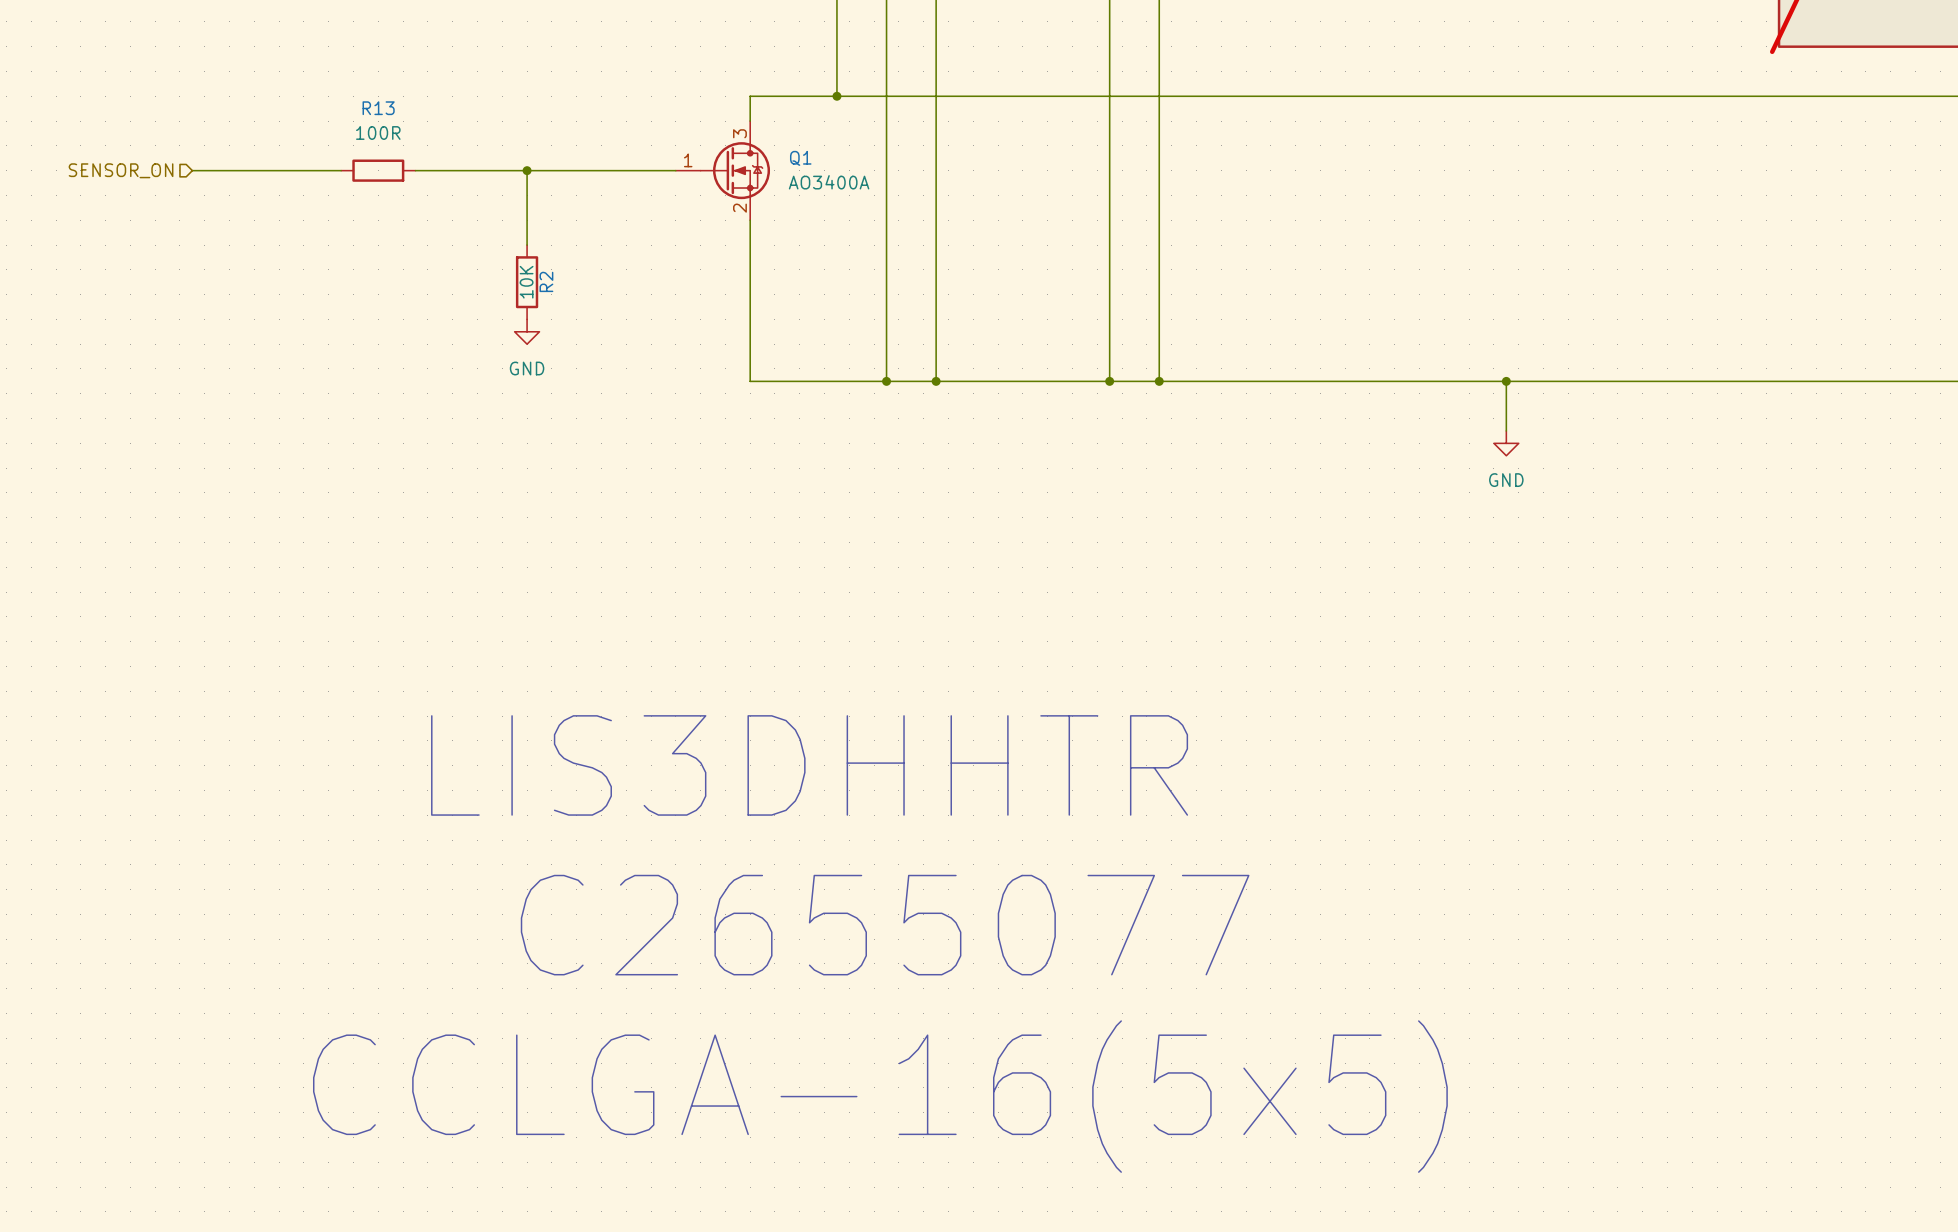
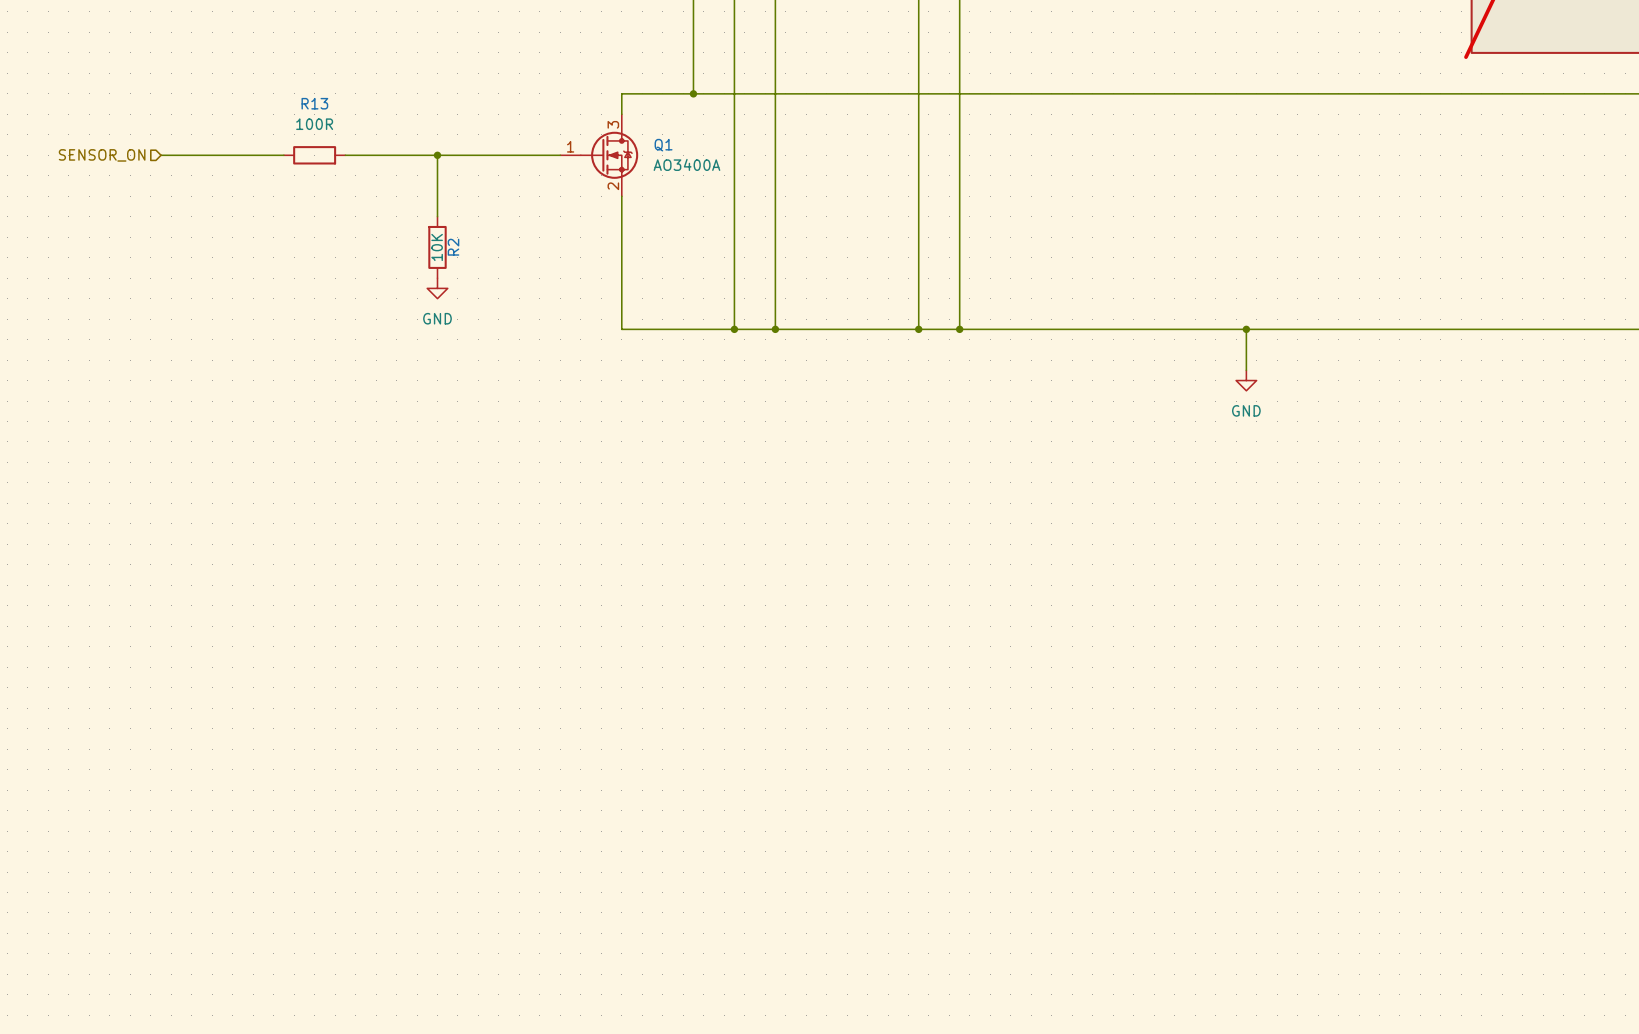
text: LIS3DHHTR (809, 765) -> none
text: C2655077 (885, 925) -> none
text: CCLGA-16(5x5) (880, 1096) -> none

